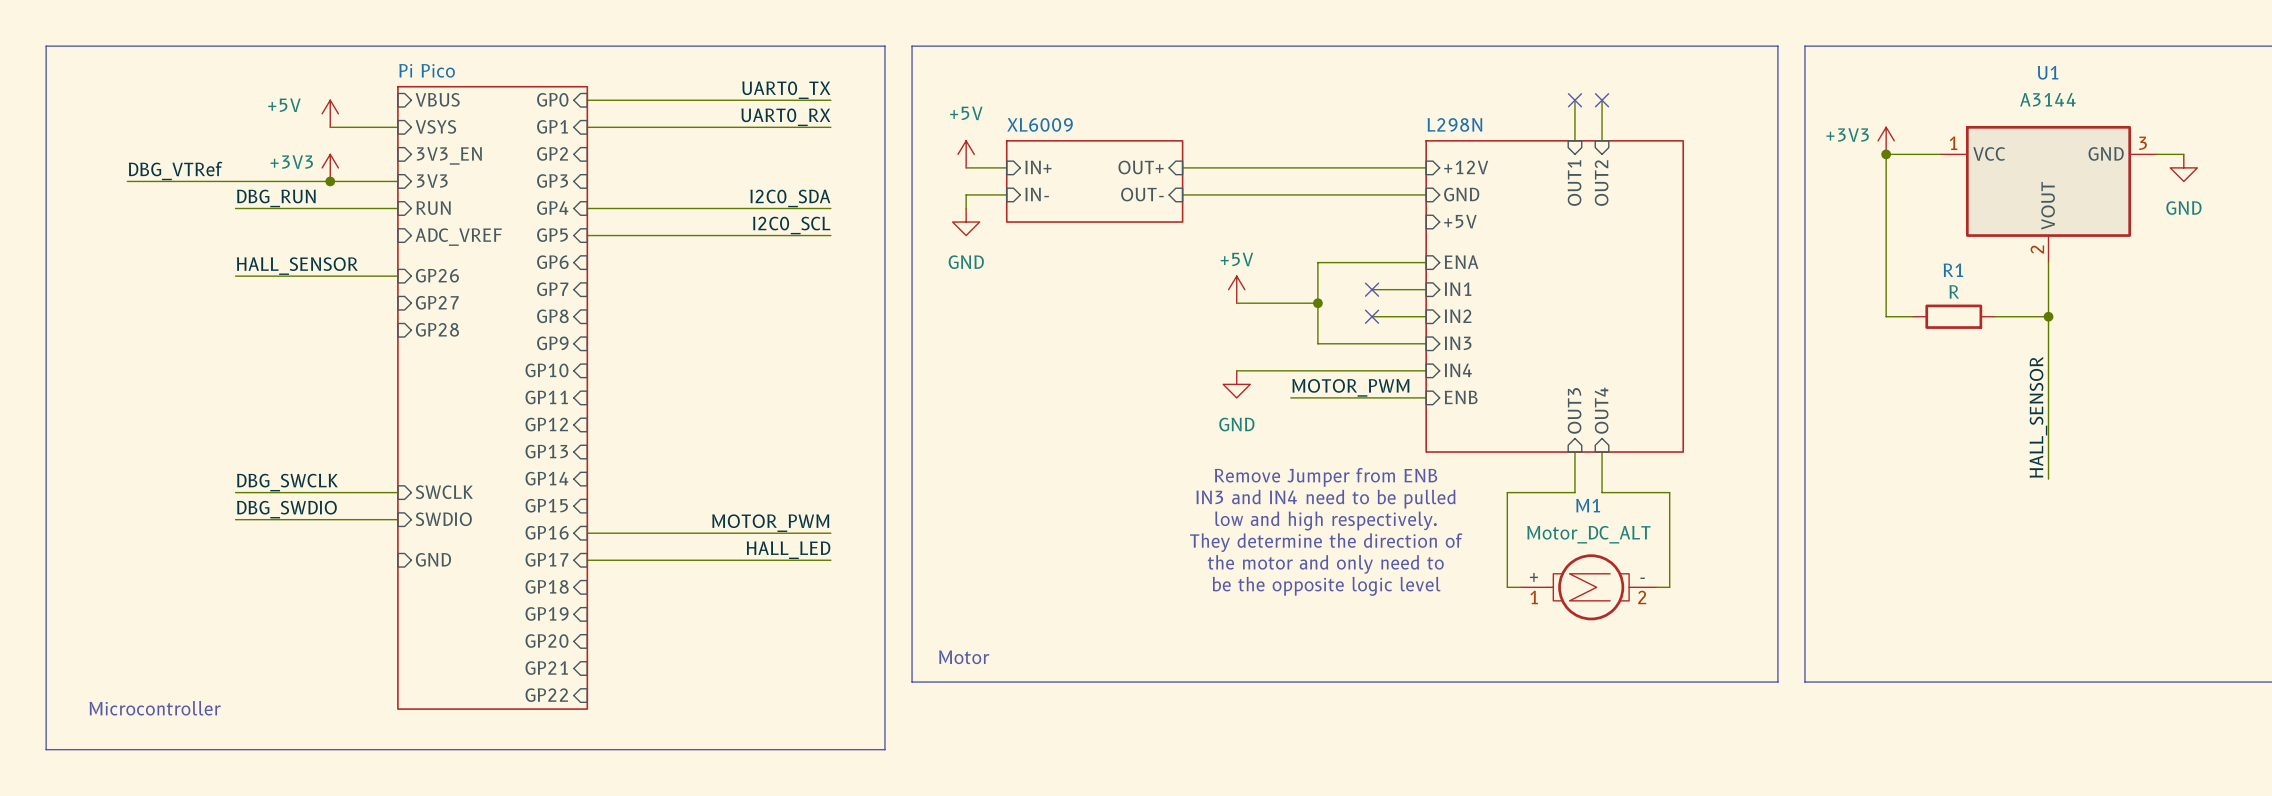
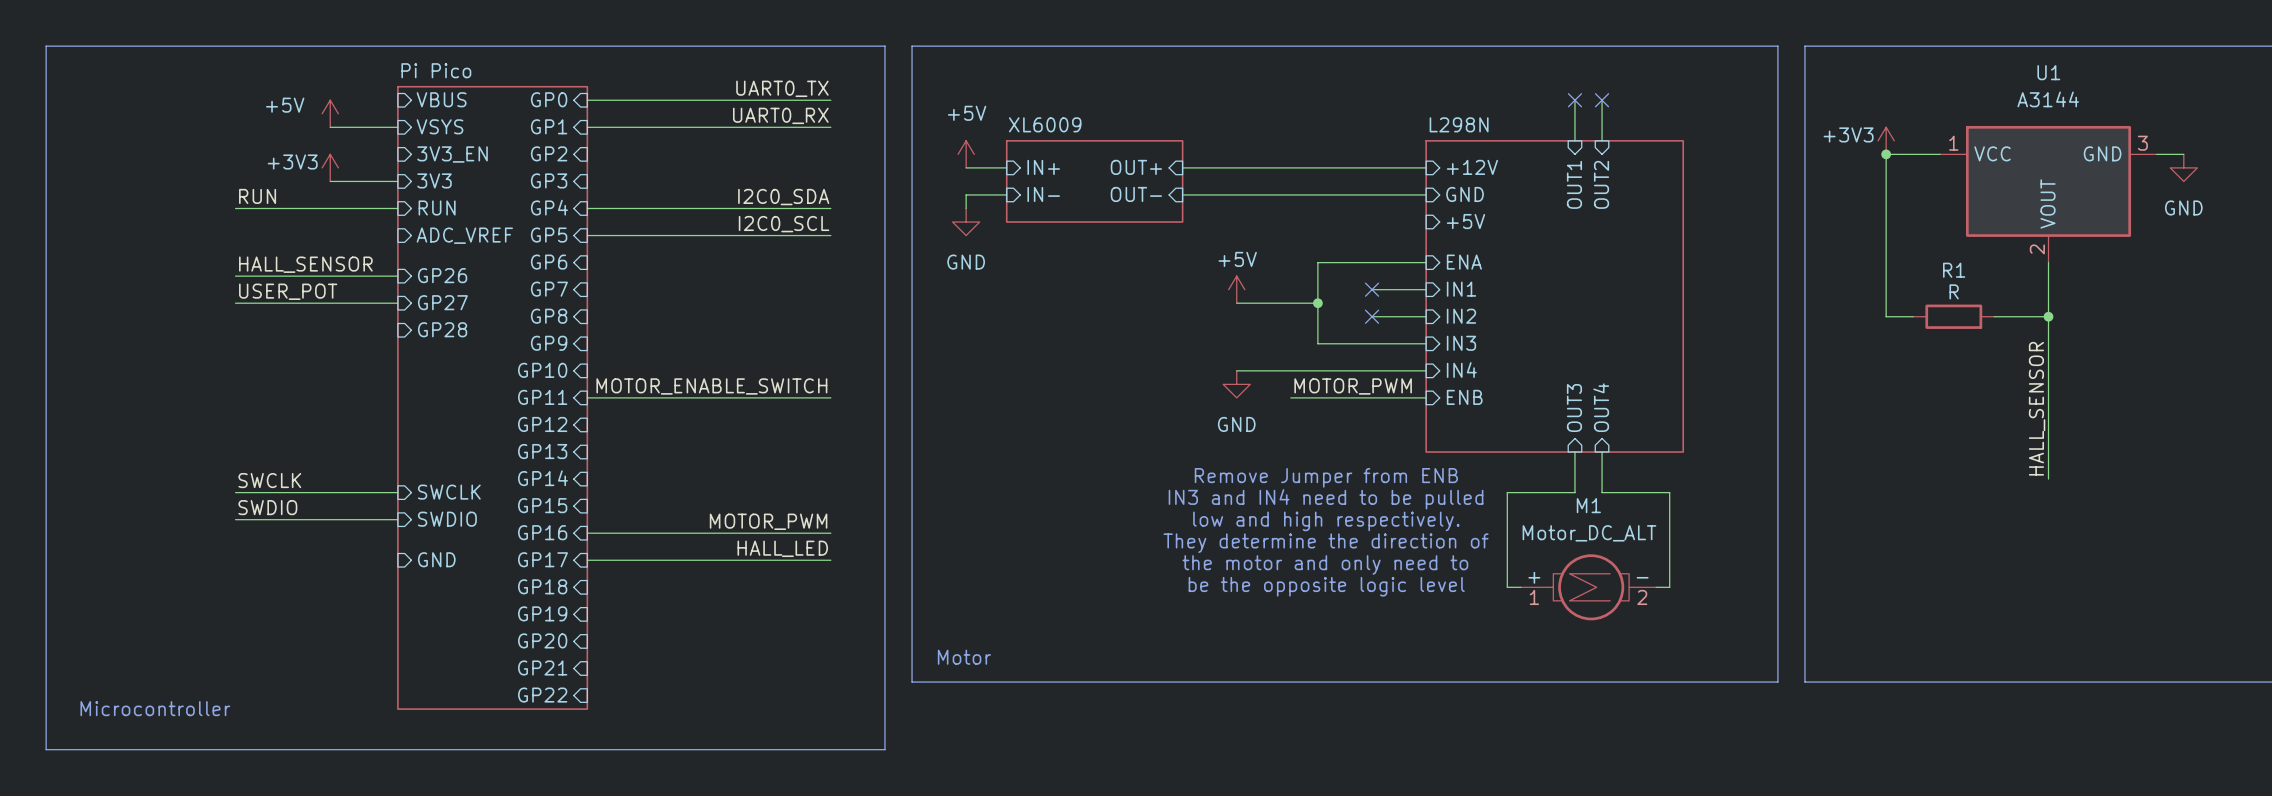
label: DBG_VTRef (175, 170) -> none
wire: (127, 181) (330, 181) -> none
junction: (330, 181) -> none
label: DBG_RUN (276, 198) -> RUN (257, 196)
label: none -> USER_POT (288, 291)
wire: none -> (235, 303) (397, 303)
label: none -> MOTOR_ENABLE_SWITCH (711, 386)
wire: none -> (587, 397) (830, 397)
label: DBG_SWCLK (287, 482) -> SWCLK (269, 480)
label: DBG_SWDIO (286, 509) -> SWDIO (267, 507)

